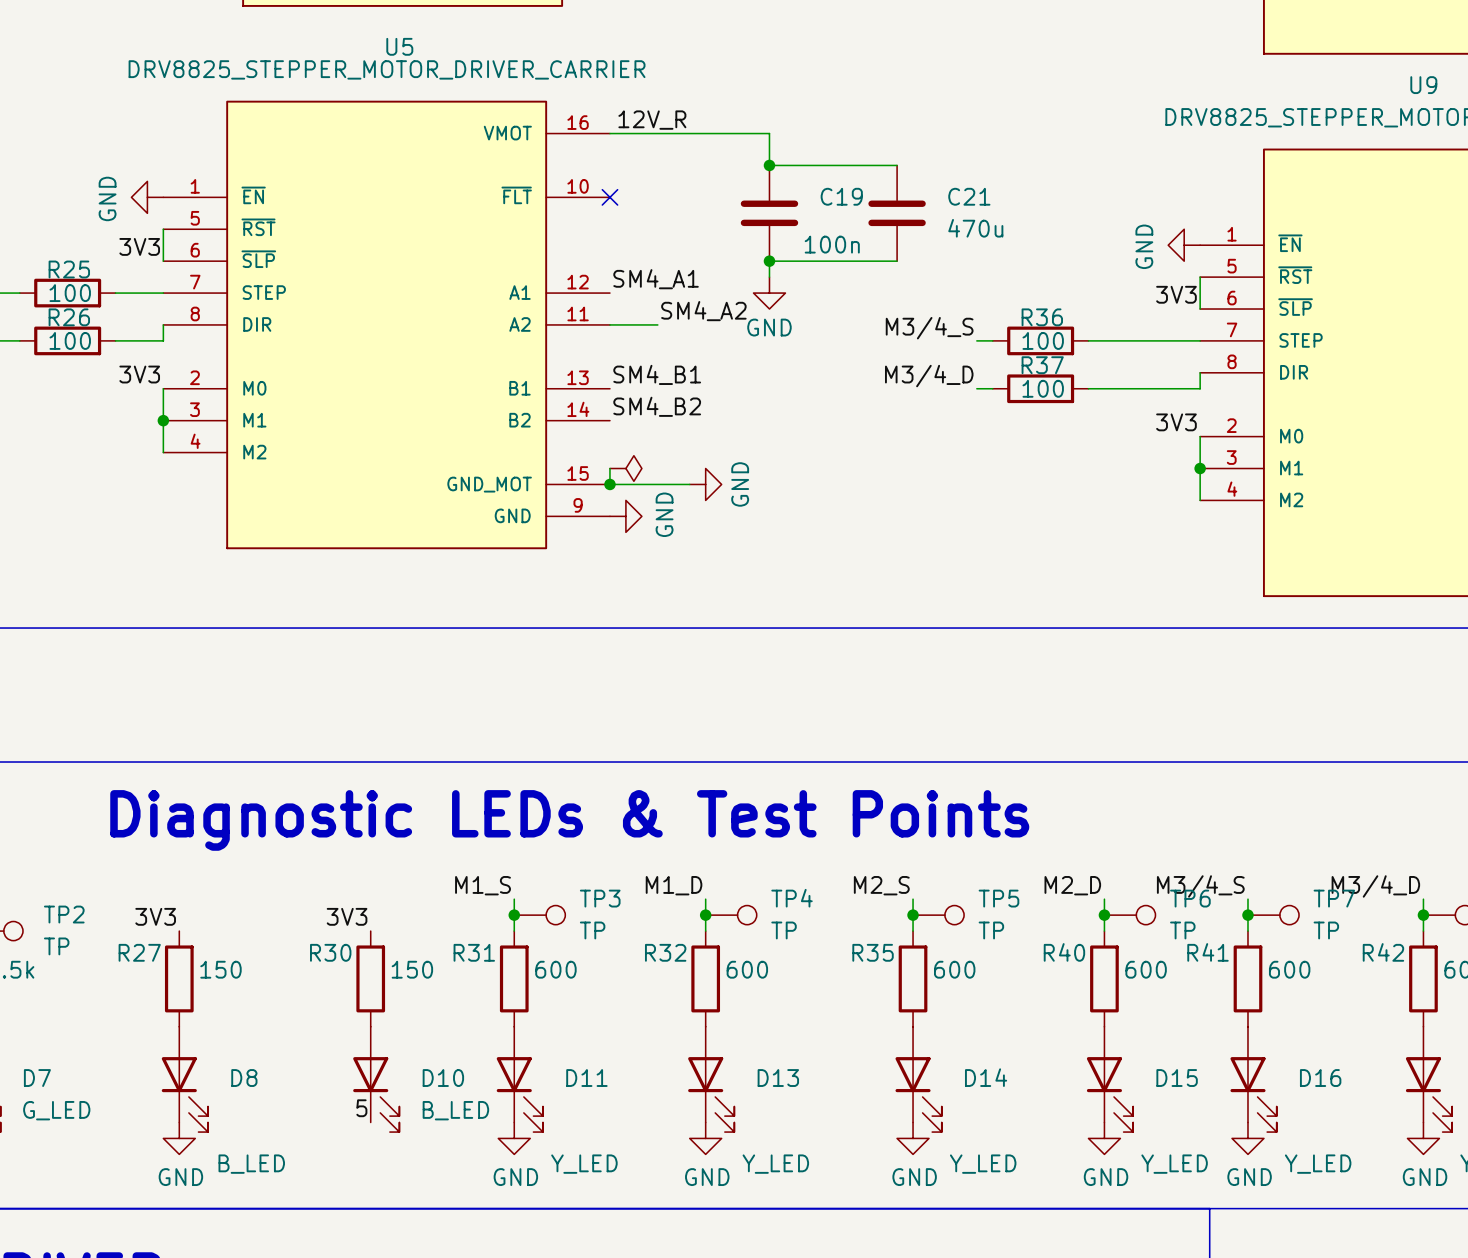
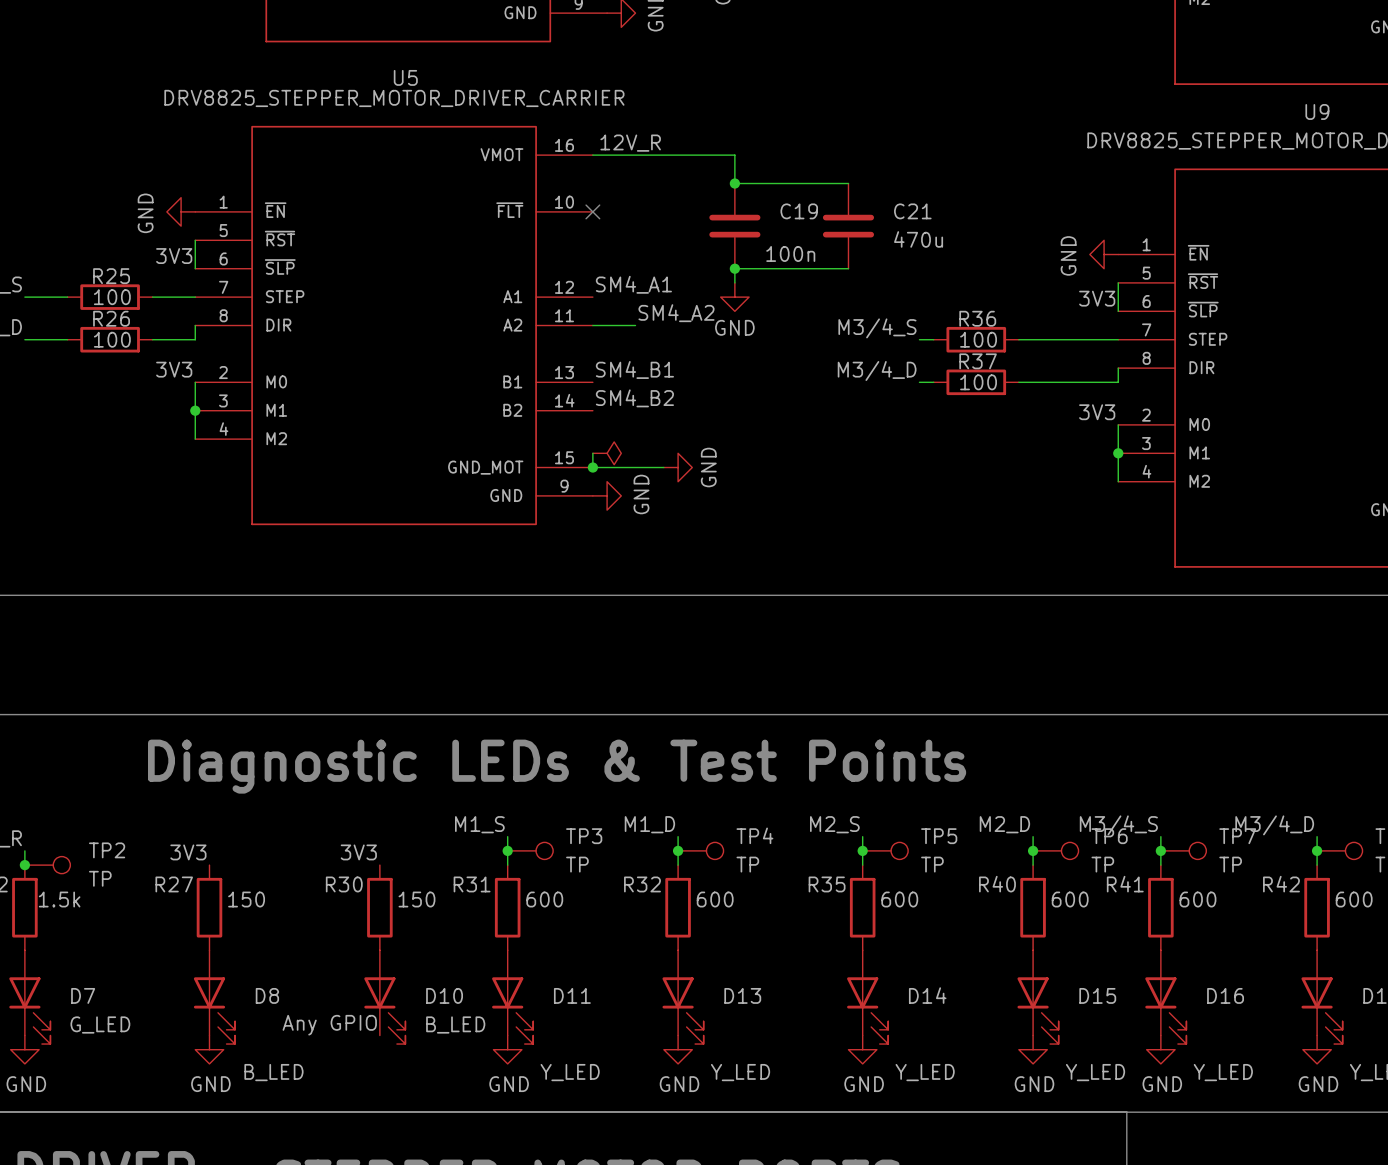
label: 5 (361, 1108) -> Any GPIO (329, 1025)

